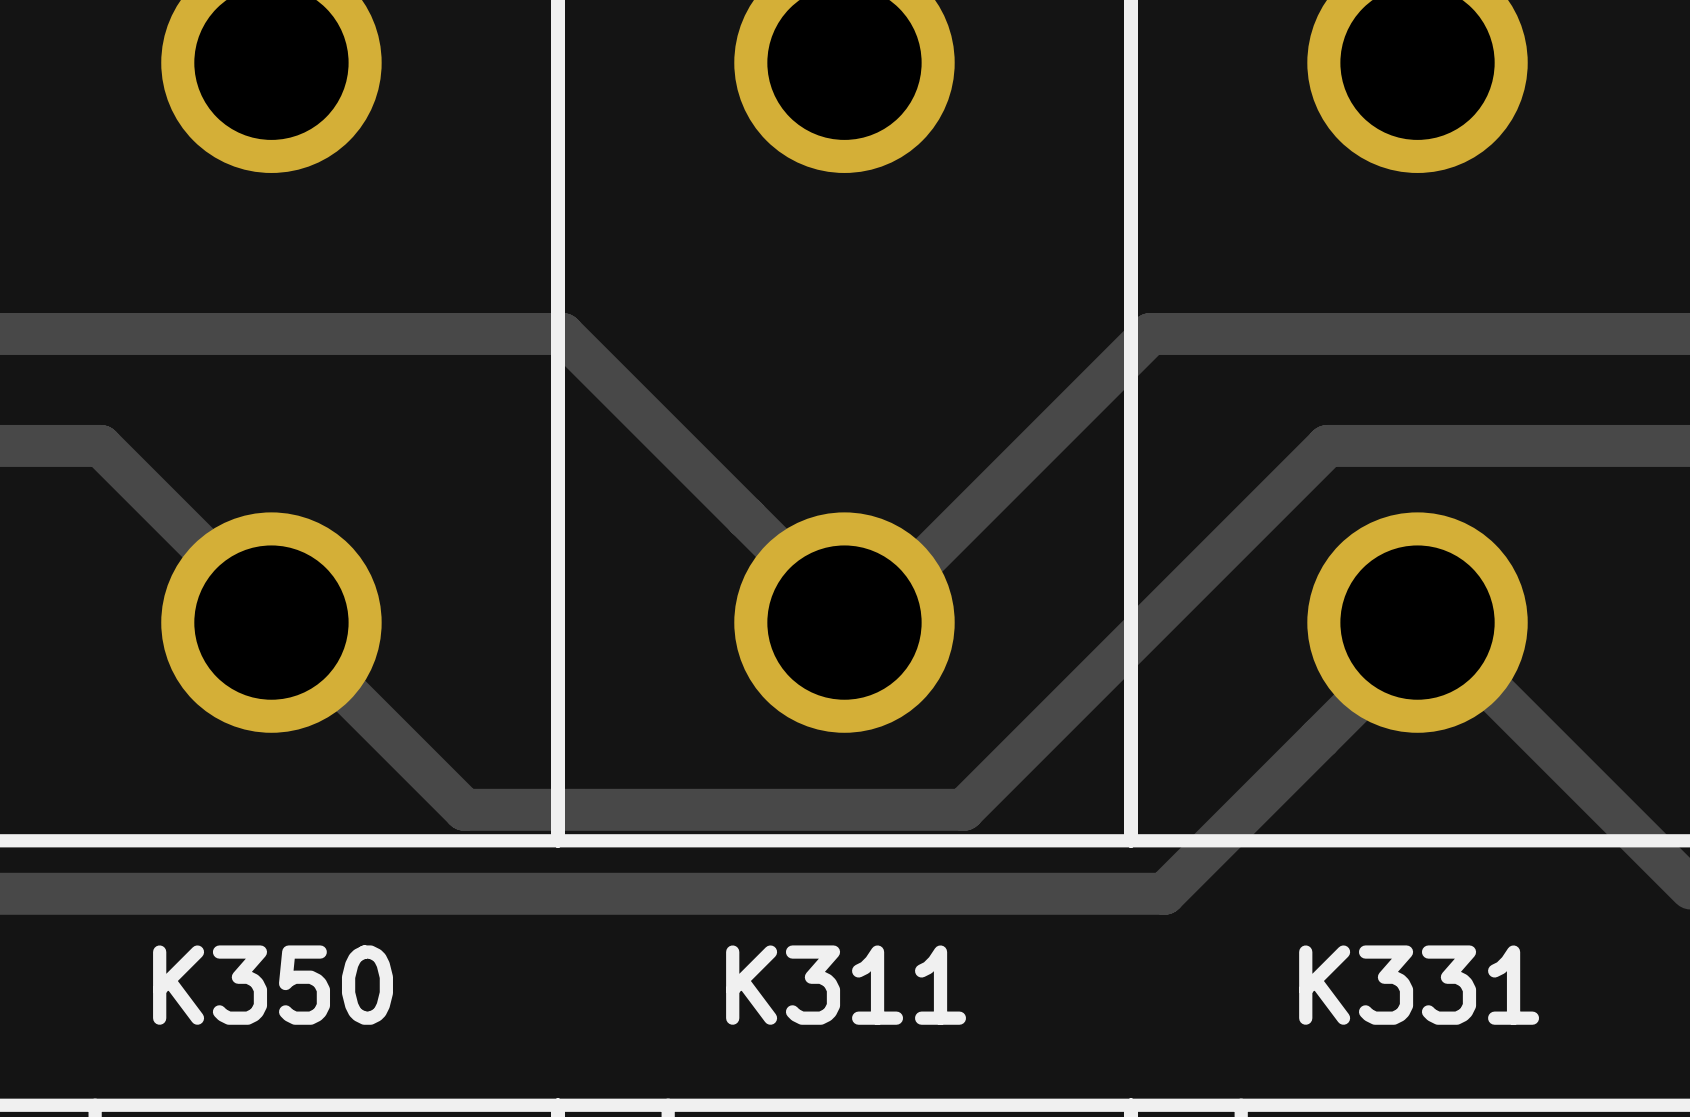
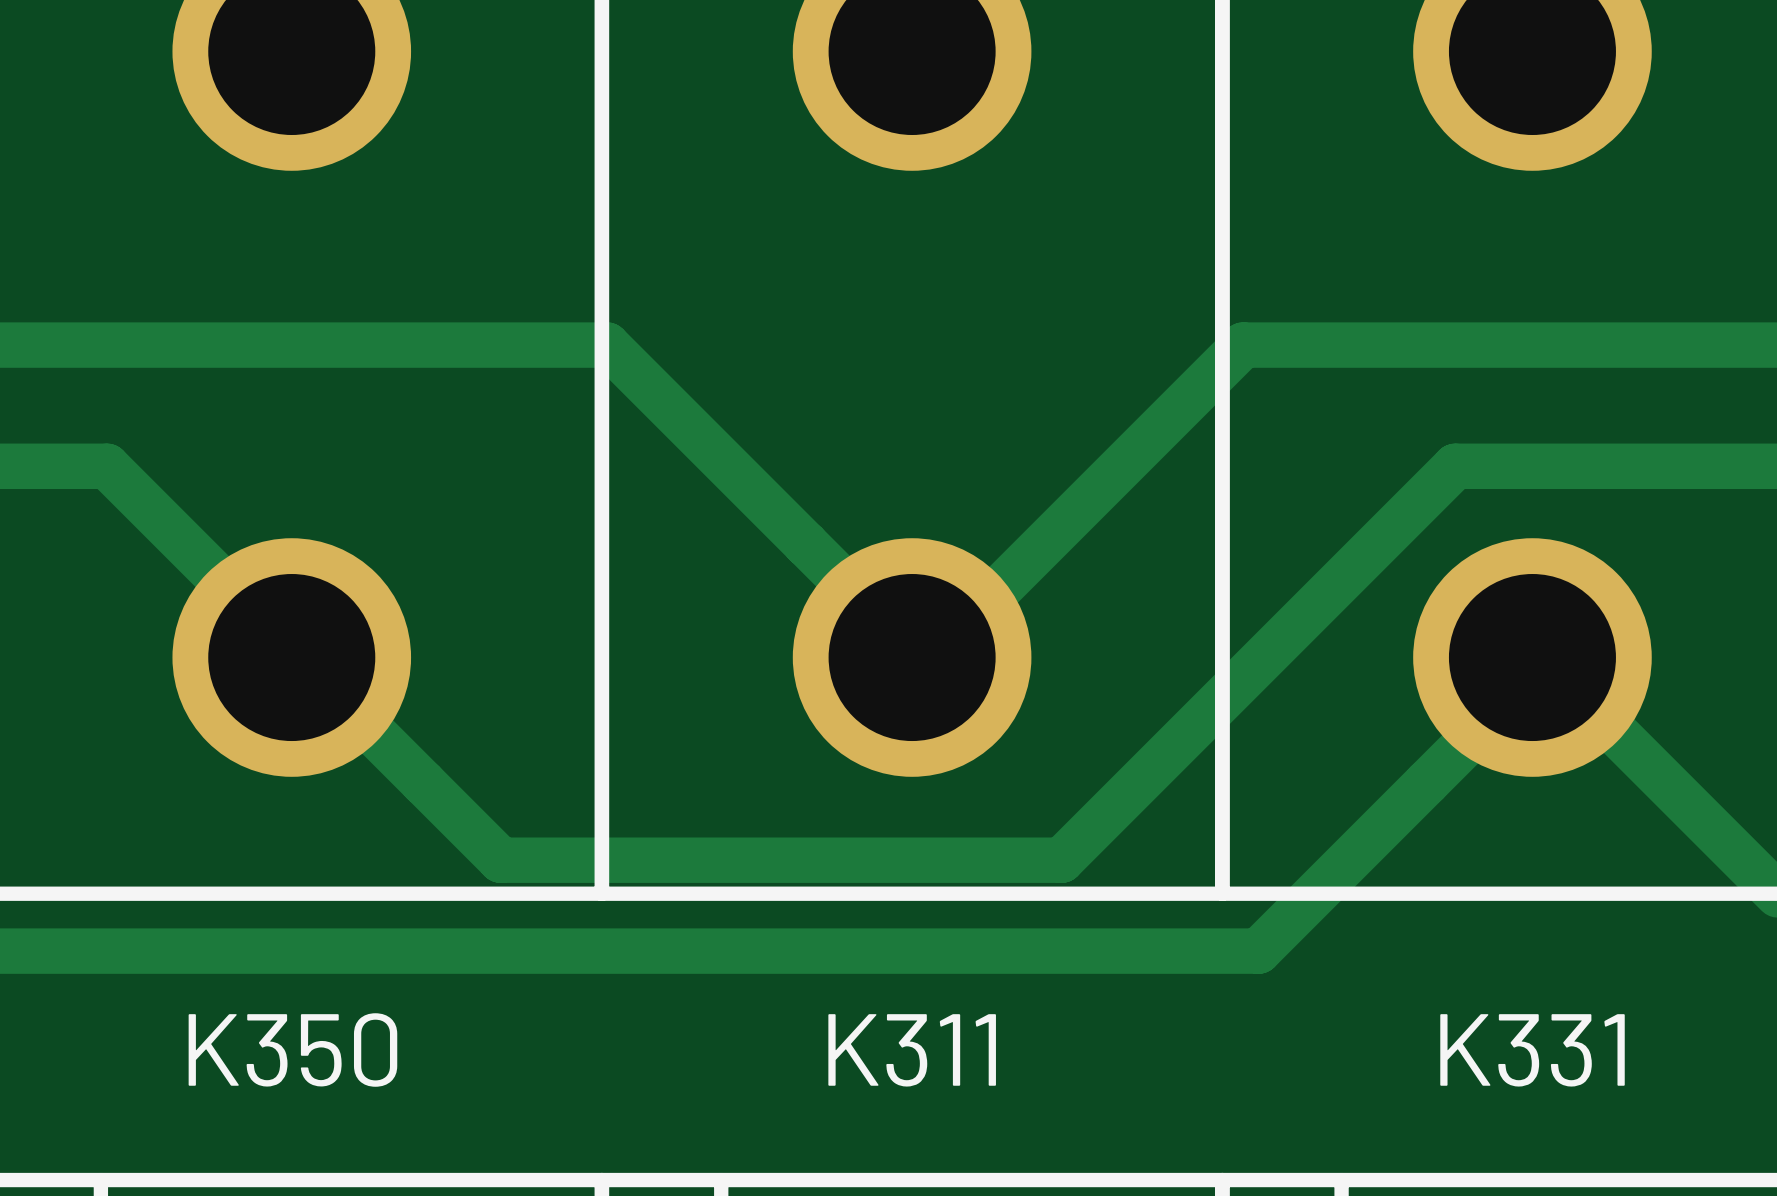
track: (1346, 445) (1327, 445) (963, 809) -> (1455, 466) (1061, 860) (1041, 860)

